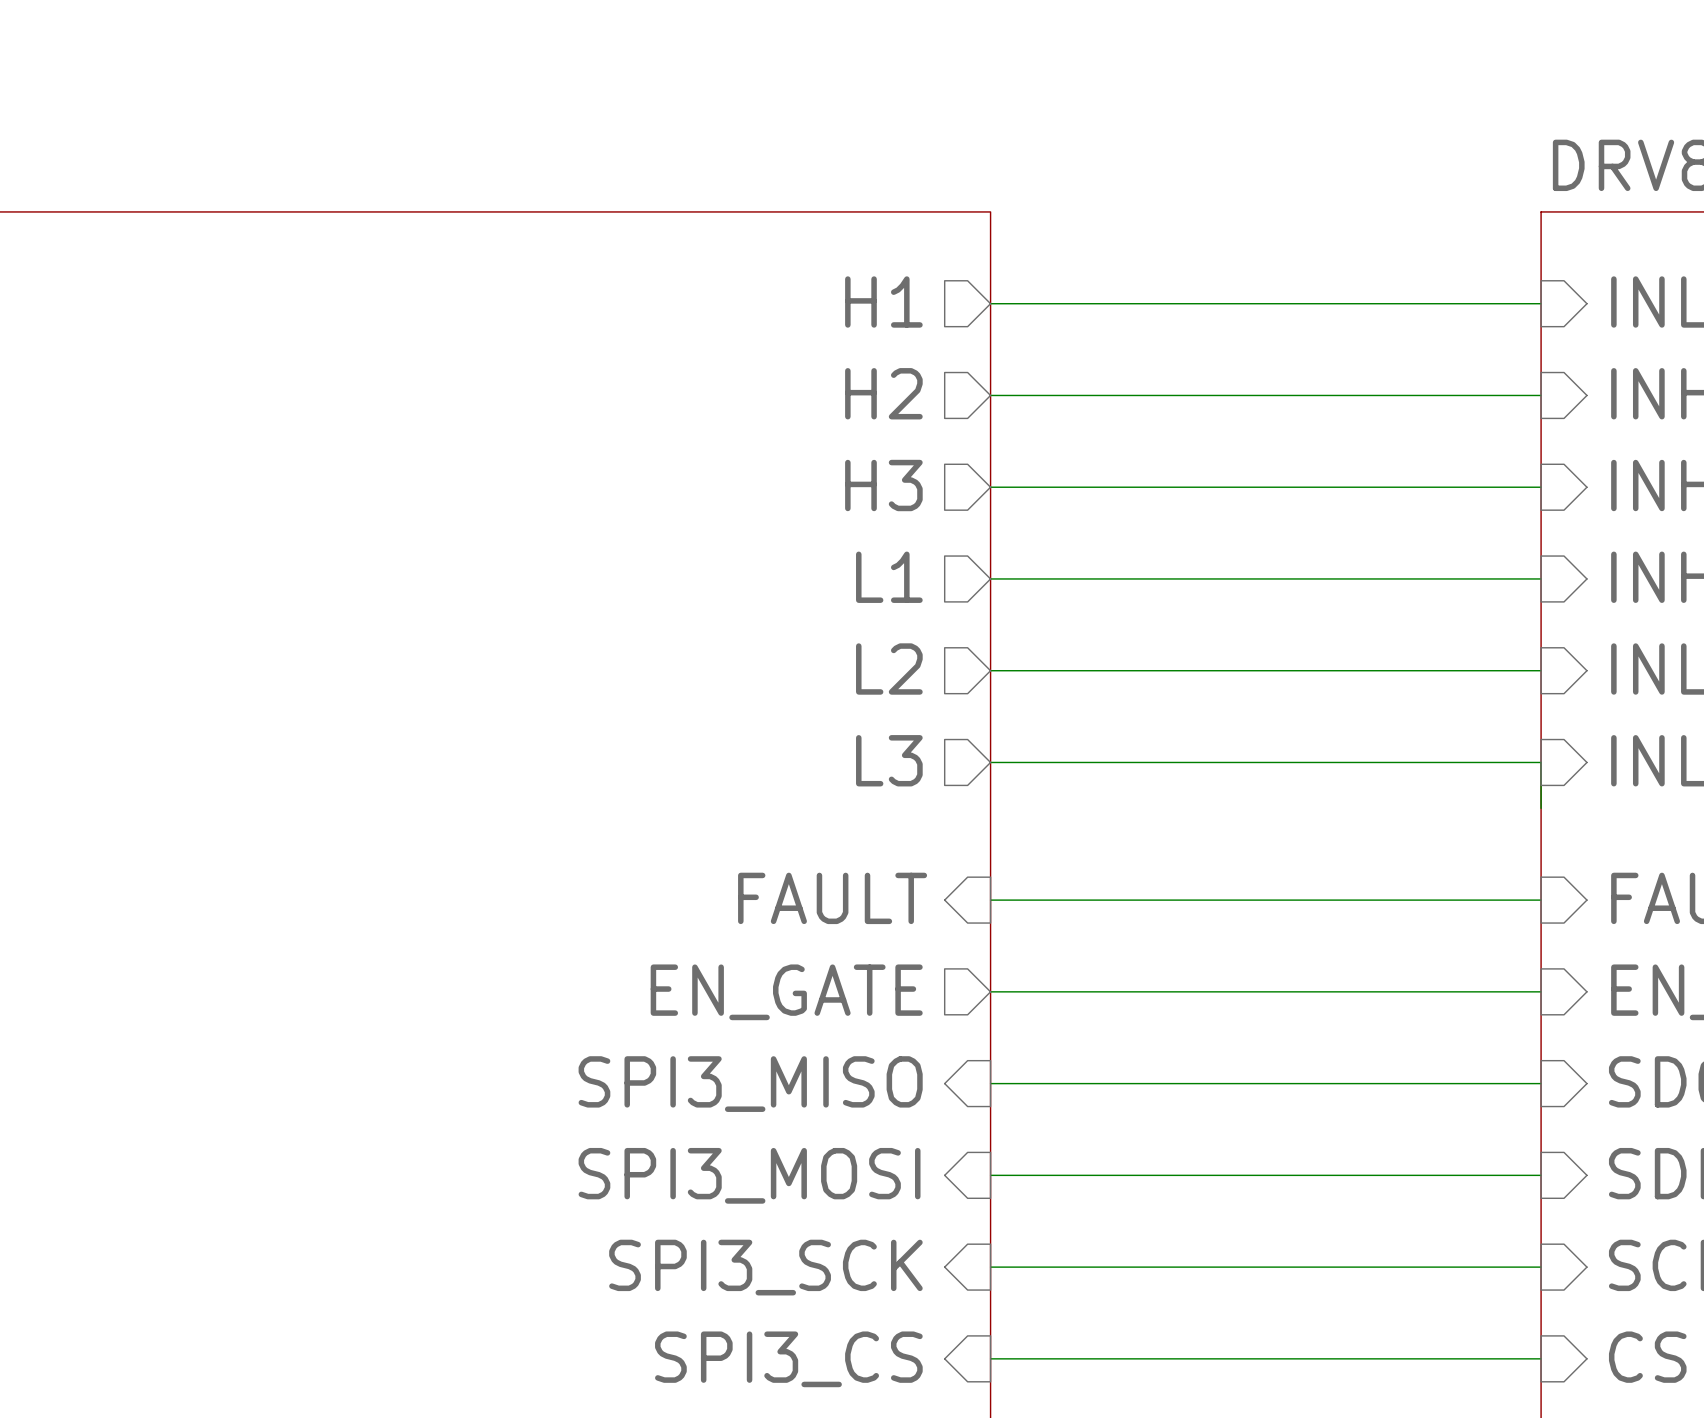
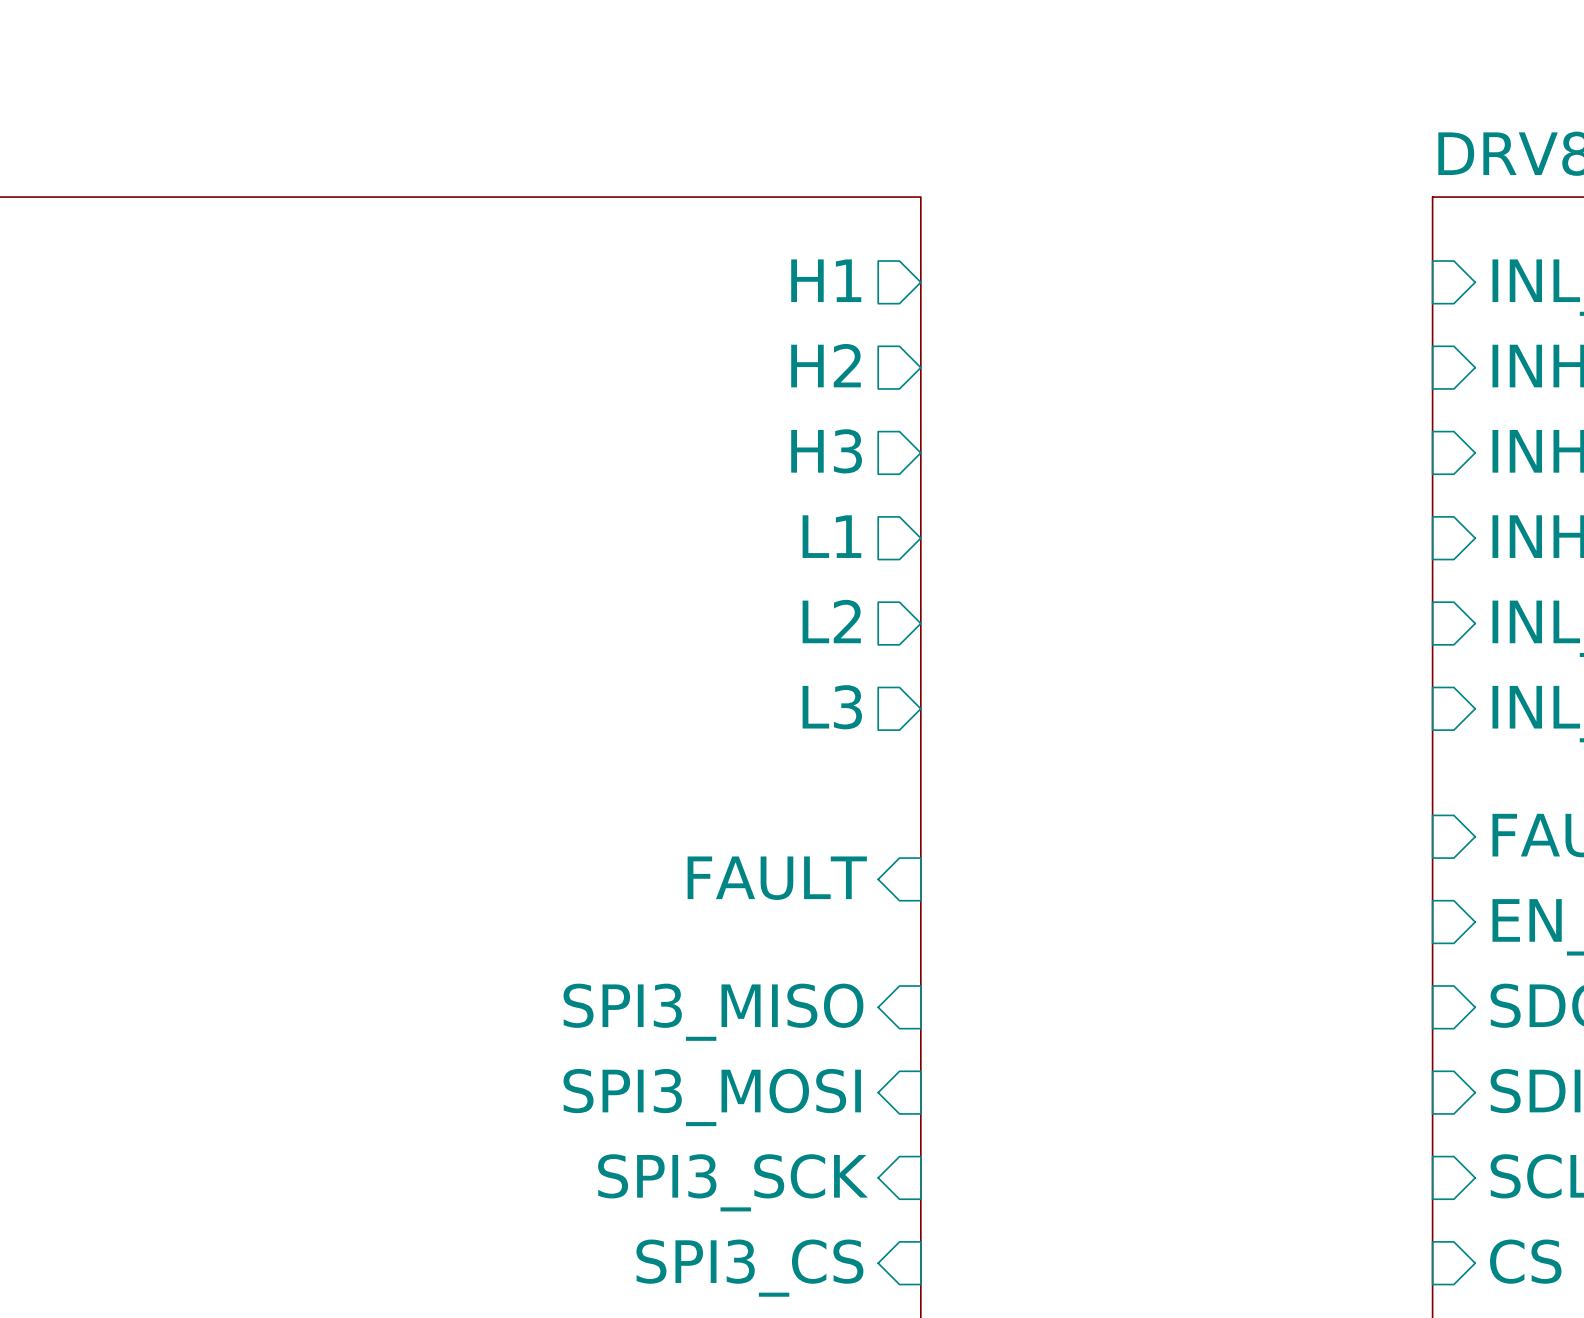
wire: (990, 303) (1541, 303) -> none
wire: (990, 395) (1541, 395) -> none
wire: (990, 487) (1541, 487) -> none
wire: (990, 578) (1541, 578) -> none
wire: (990, 670) (1541, 670) -> none
wire: (990, 762) (1541, 762) (1541, 808) -> none
sheet pin position: FAULT (832, 898) -> FAULT (777, 878)
wire: (990, 900) (1541, 900) -> none
wire: (990, 991) (1541, 991) -> none
sheet pin: EN_GATE (786, 992) -> none
wire: (990, 1083) (1541, 1083) -> none
wire: (990, 1175) (1541, 1175) -> none
wire: (990, 1267) (1541, 1267) -> none
wire: (990, 1358) (1541, 1358) -> none

